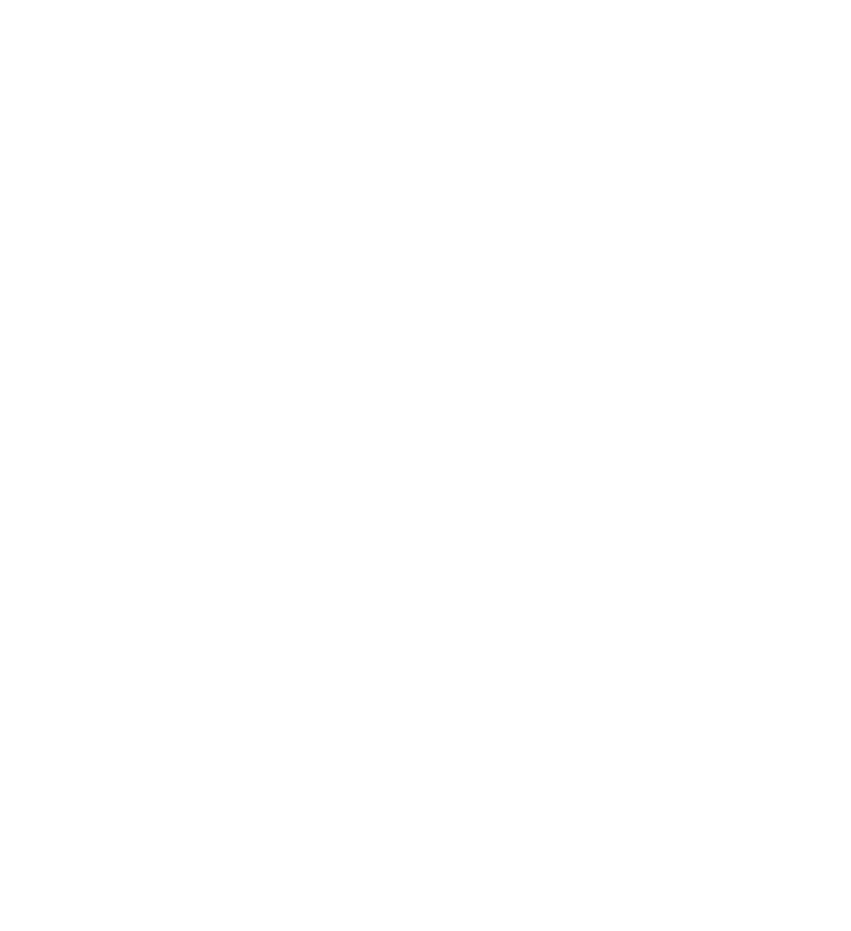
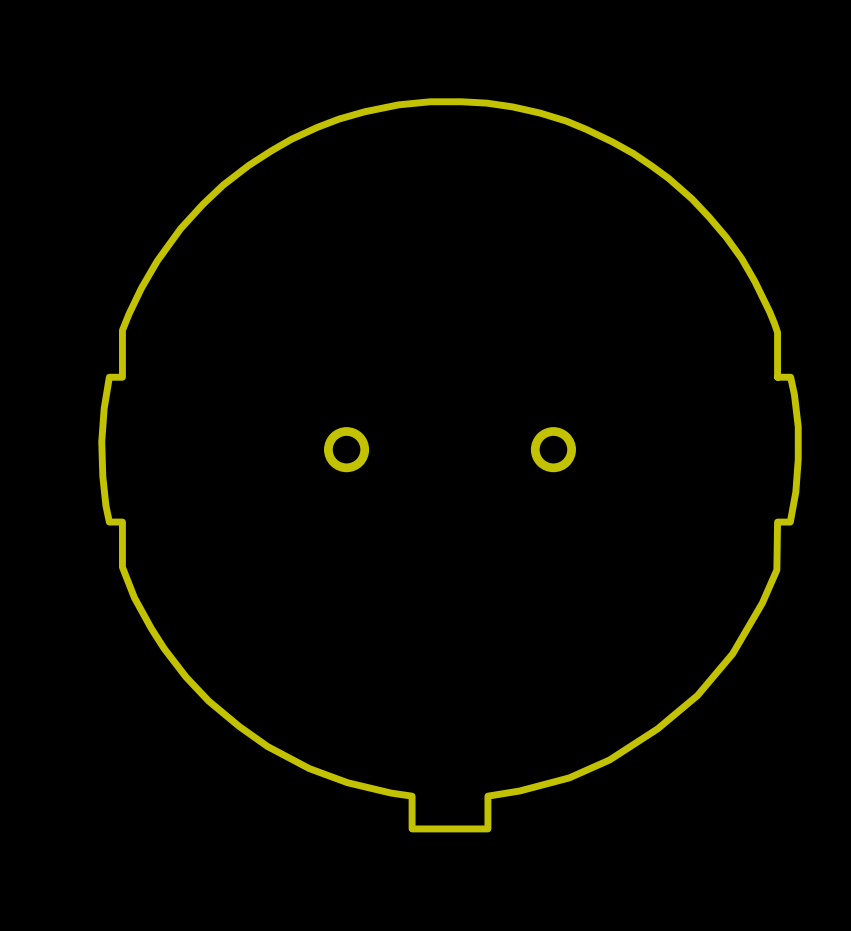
part: none -> (449, 465)

